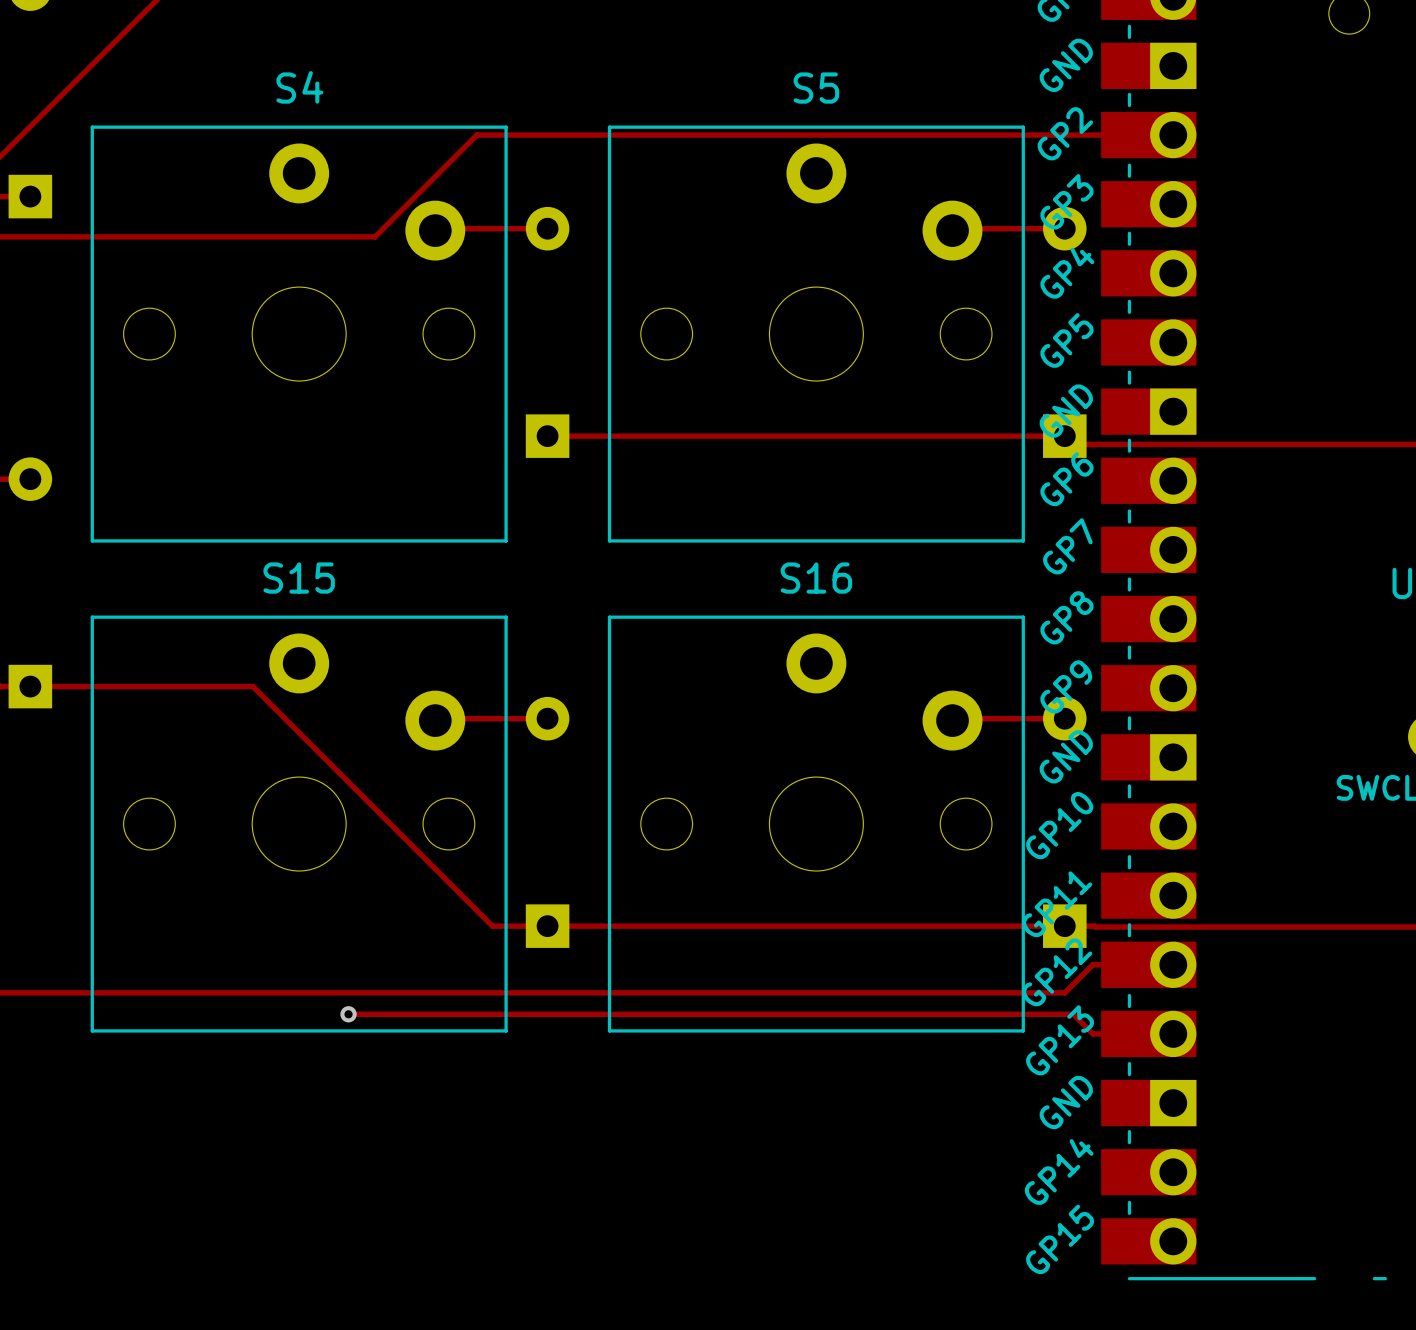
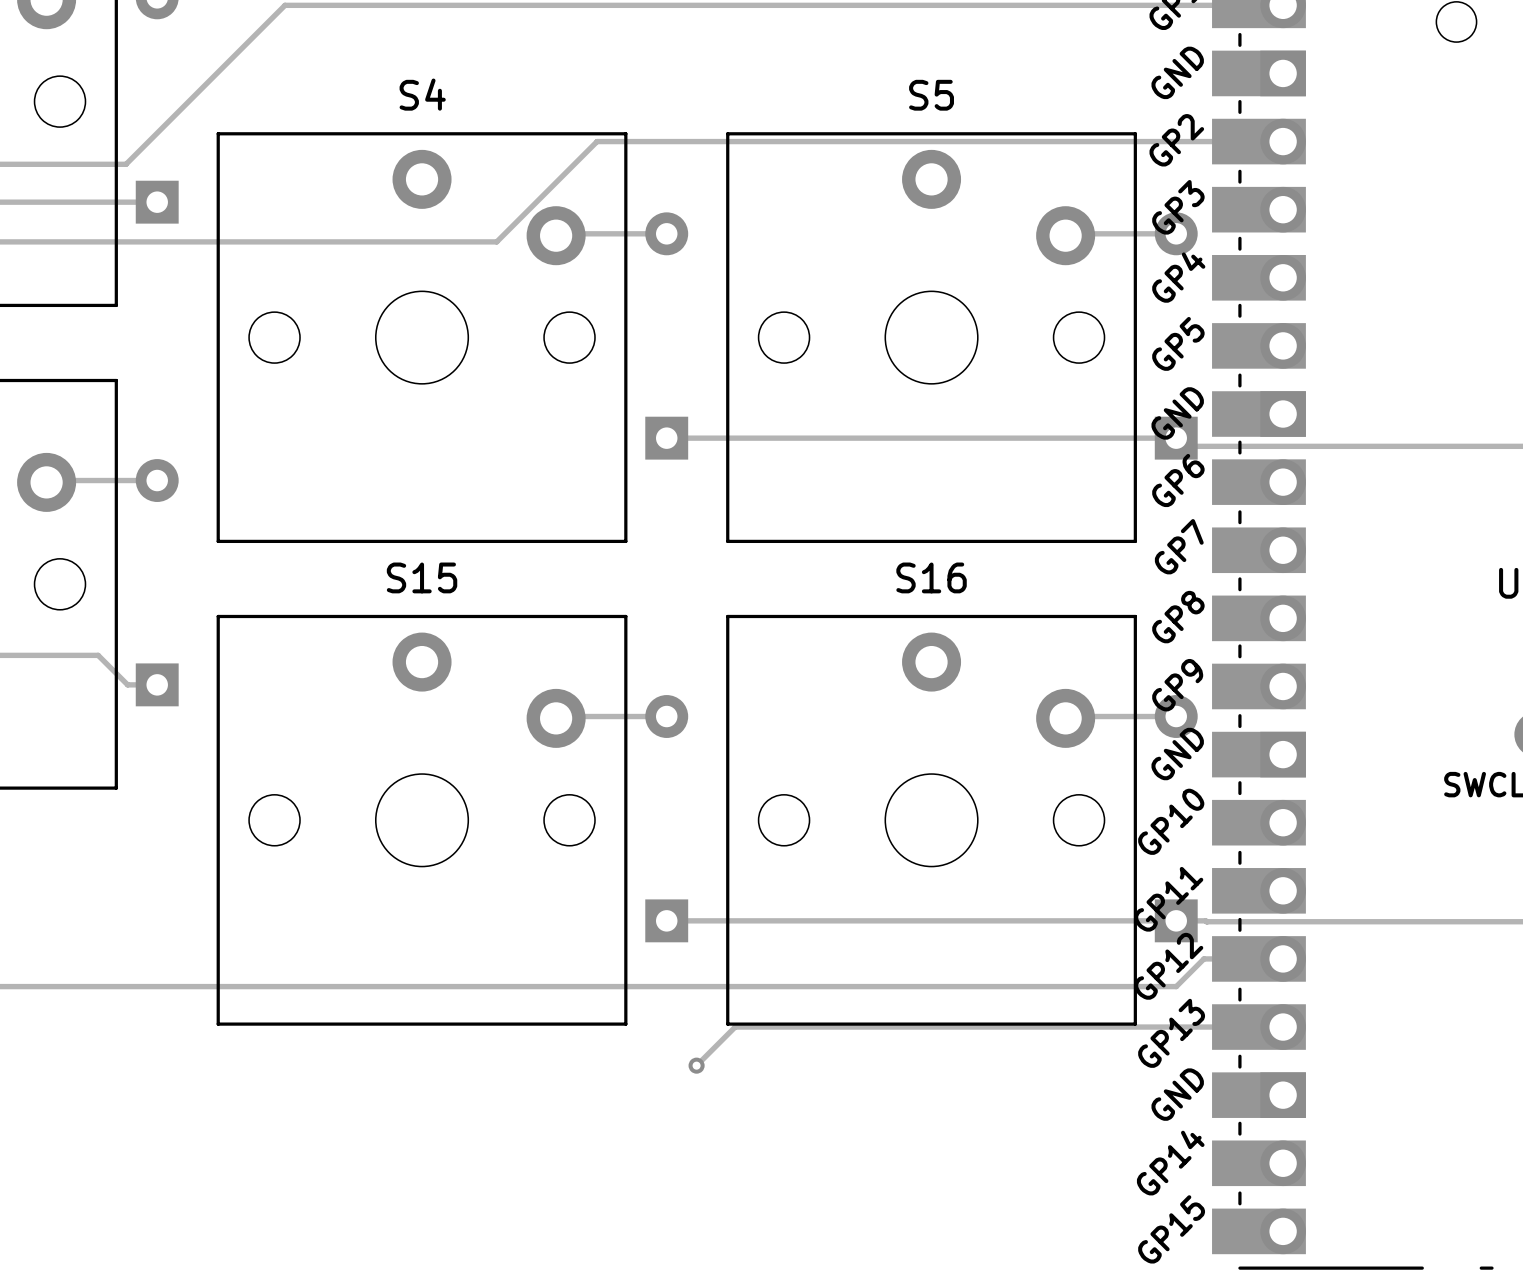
track: (30, 686) (252, 686) (492, 926) (547, 926) -> none
track: (348, 1014) (1073, 1014) (1092, 1033) -> (696, 1065) (735, 1027) (1203, 1027)
via: (348, 1014) -> none
via: none -> (696, 1065)

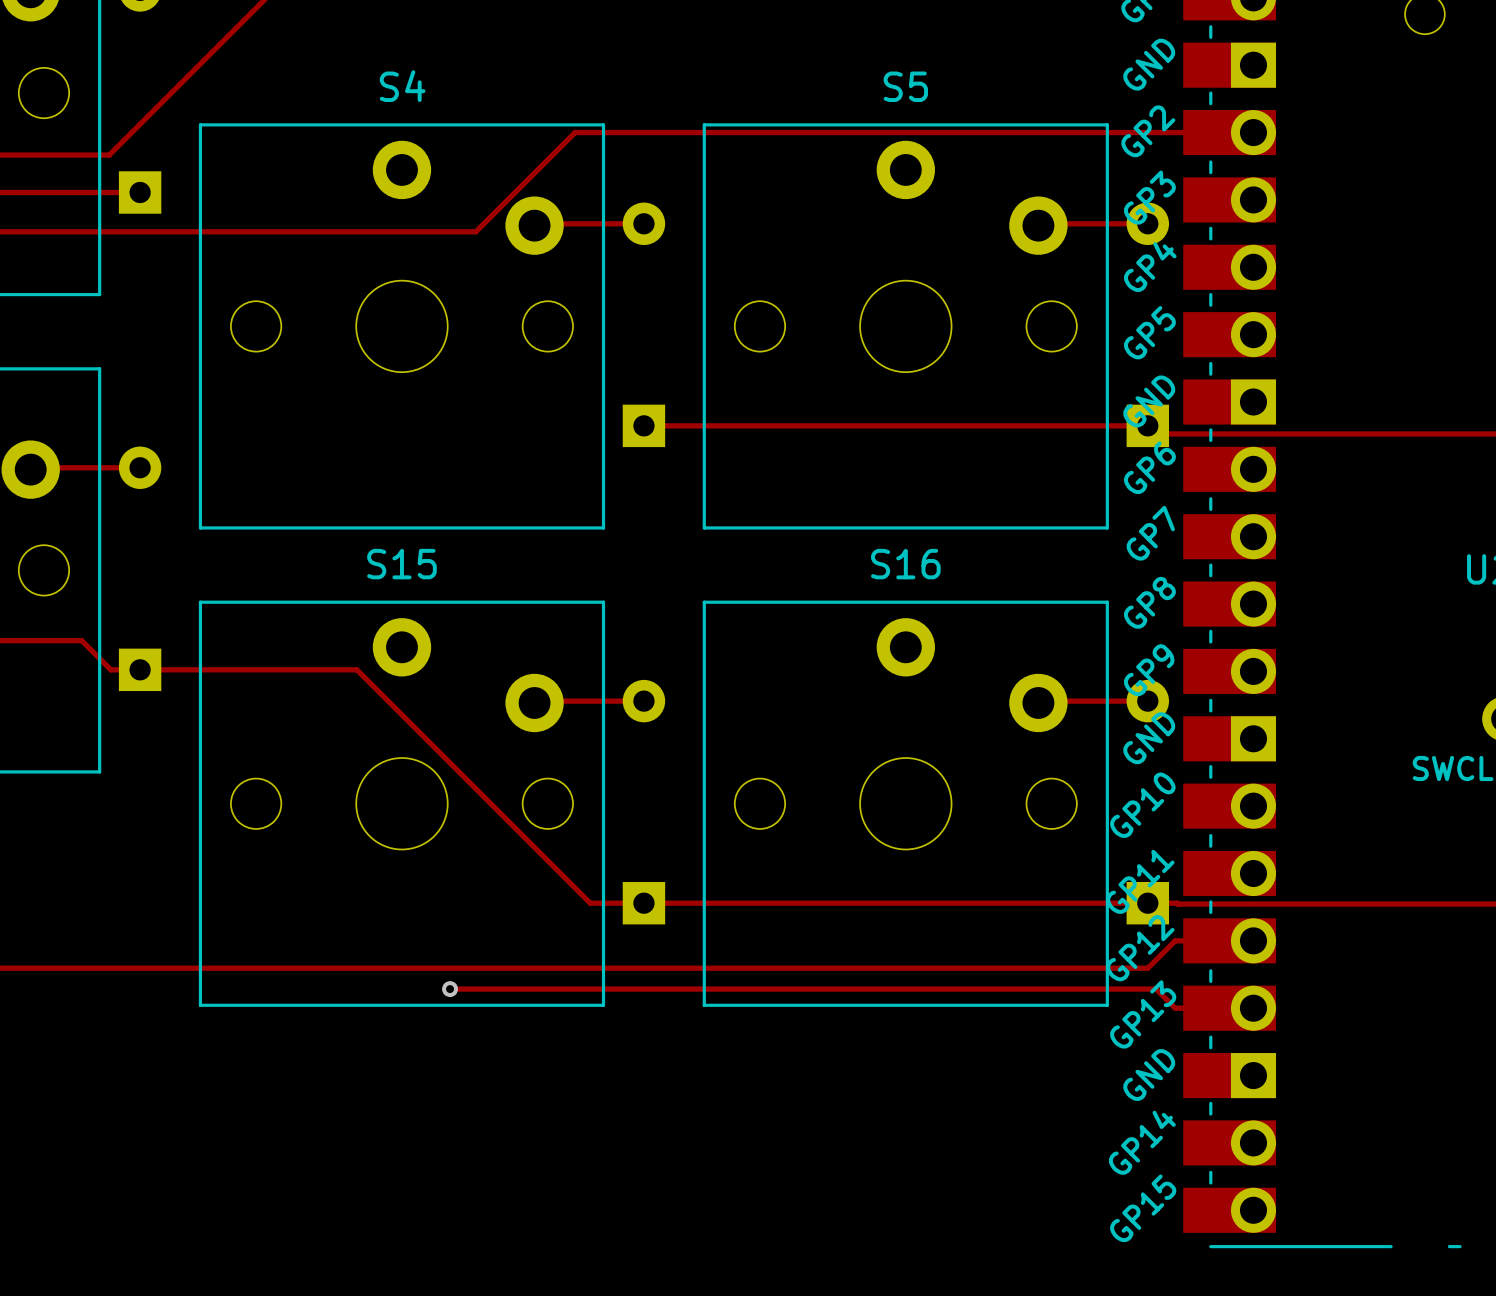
track: none -> (140, 669) (356, 669) (590, 903) (643, 903)
via: none -> (450, 989)
track: (1203, 1027) (735, 1027) (696, 1065) -> (1175, 1008) (1156, 989) (450, 989)
via: (696, 1065) -> none

